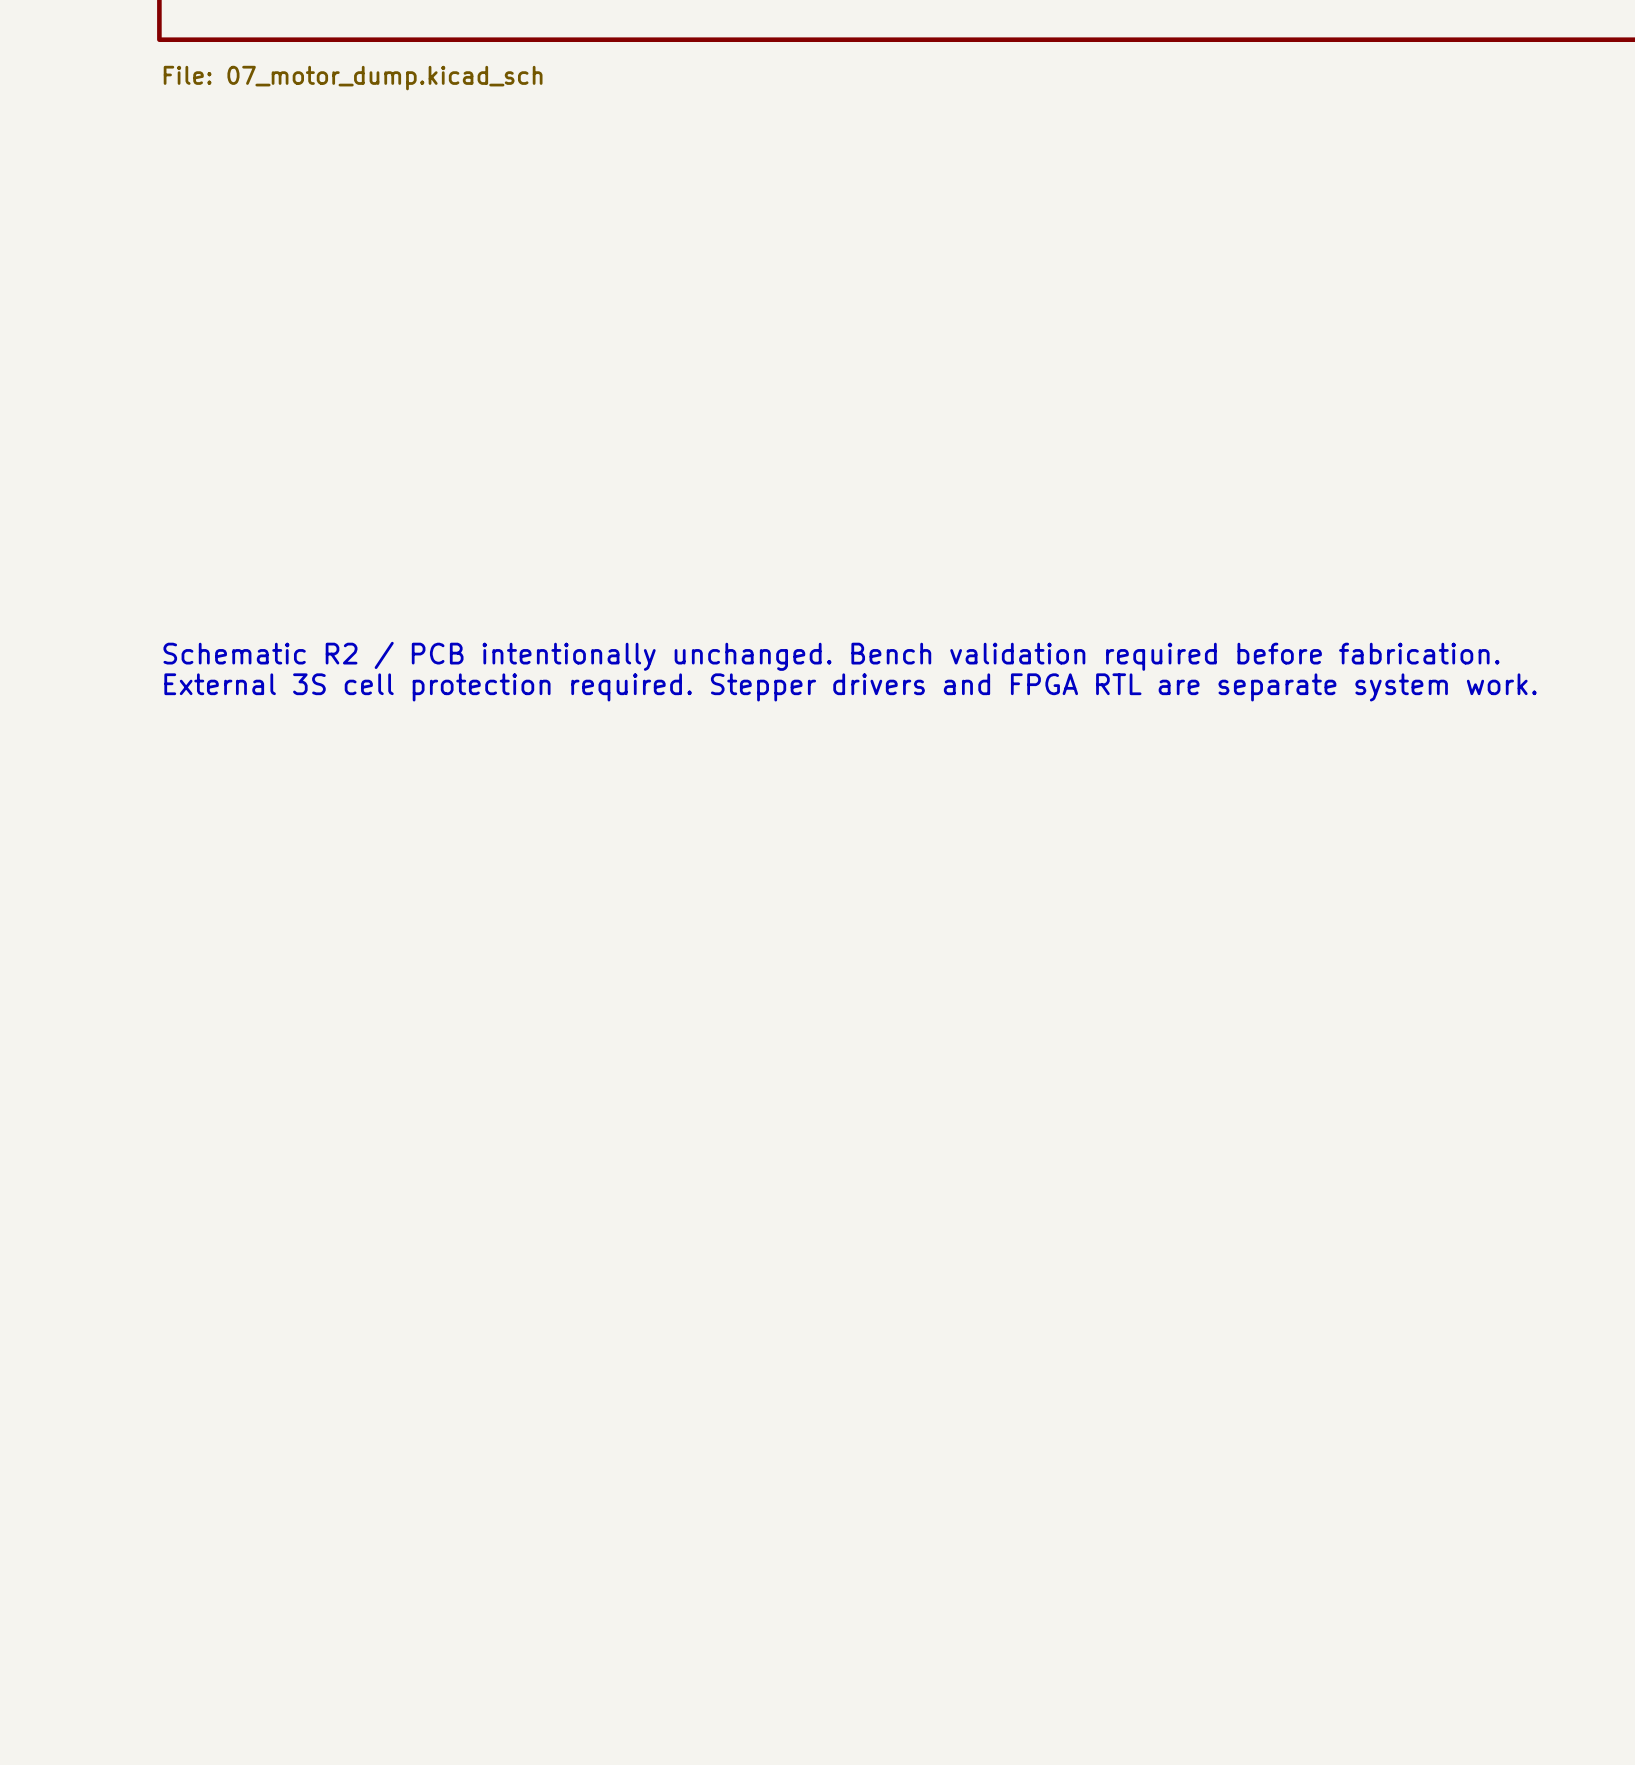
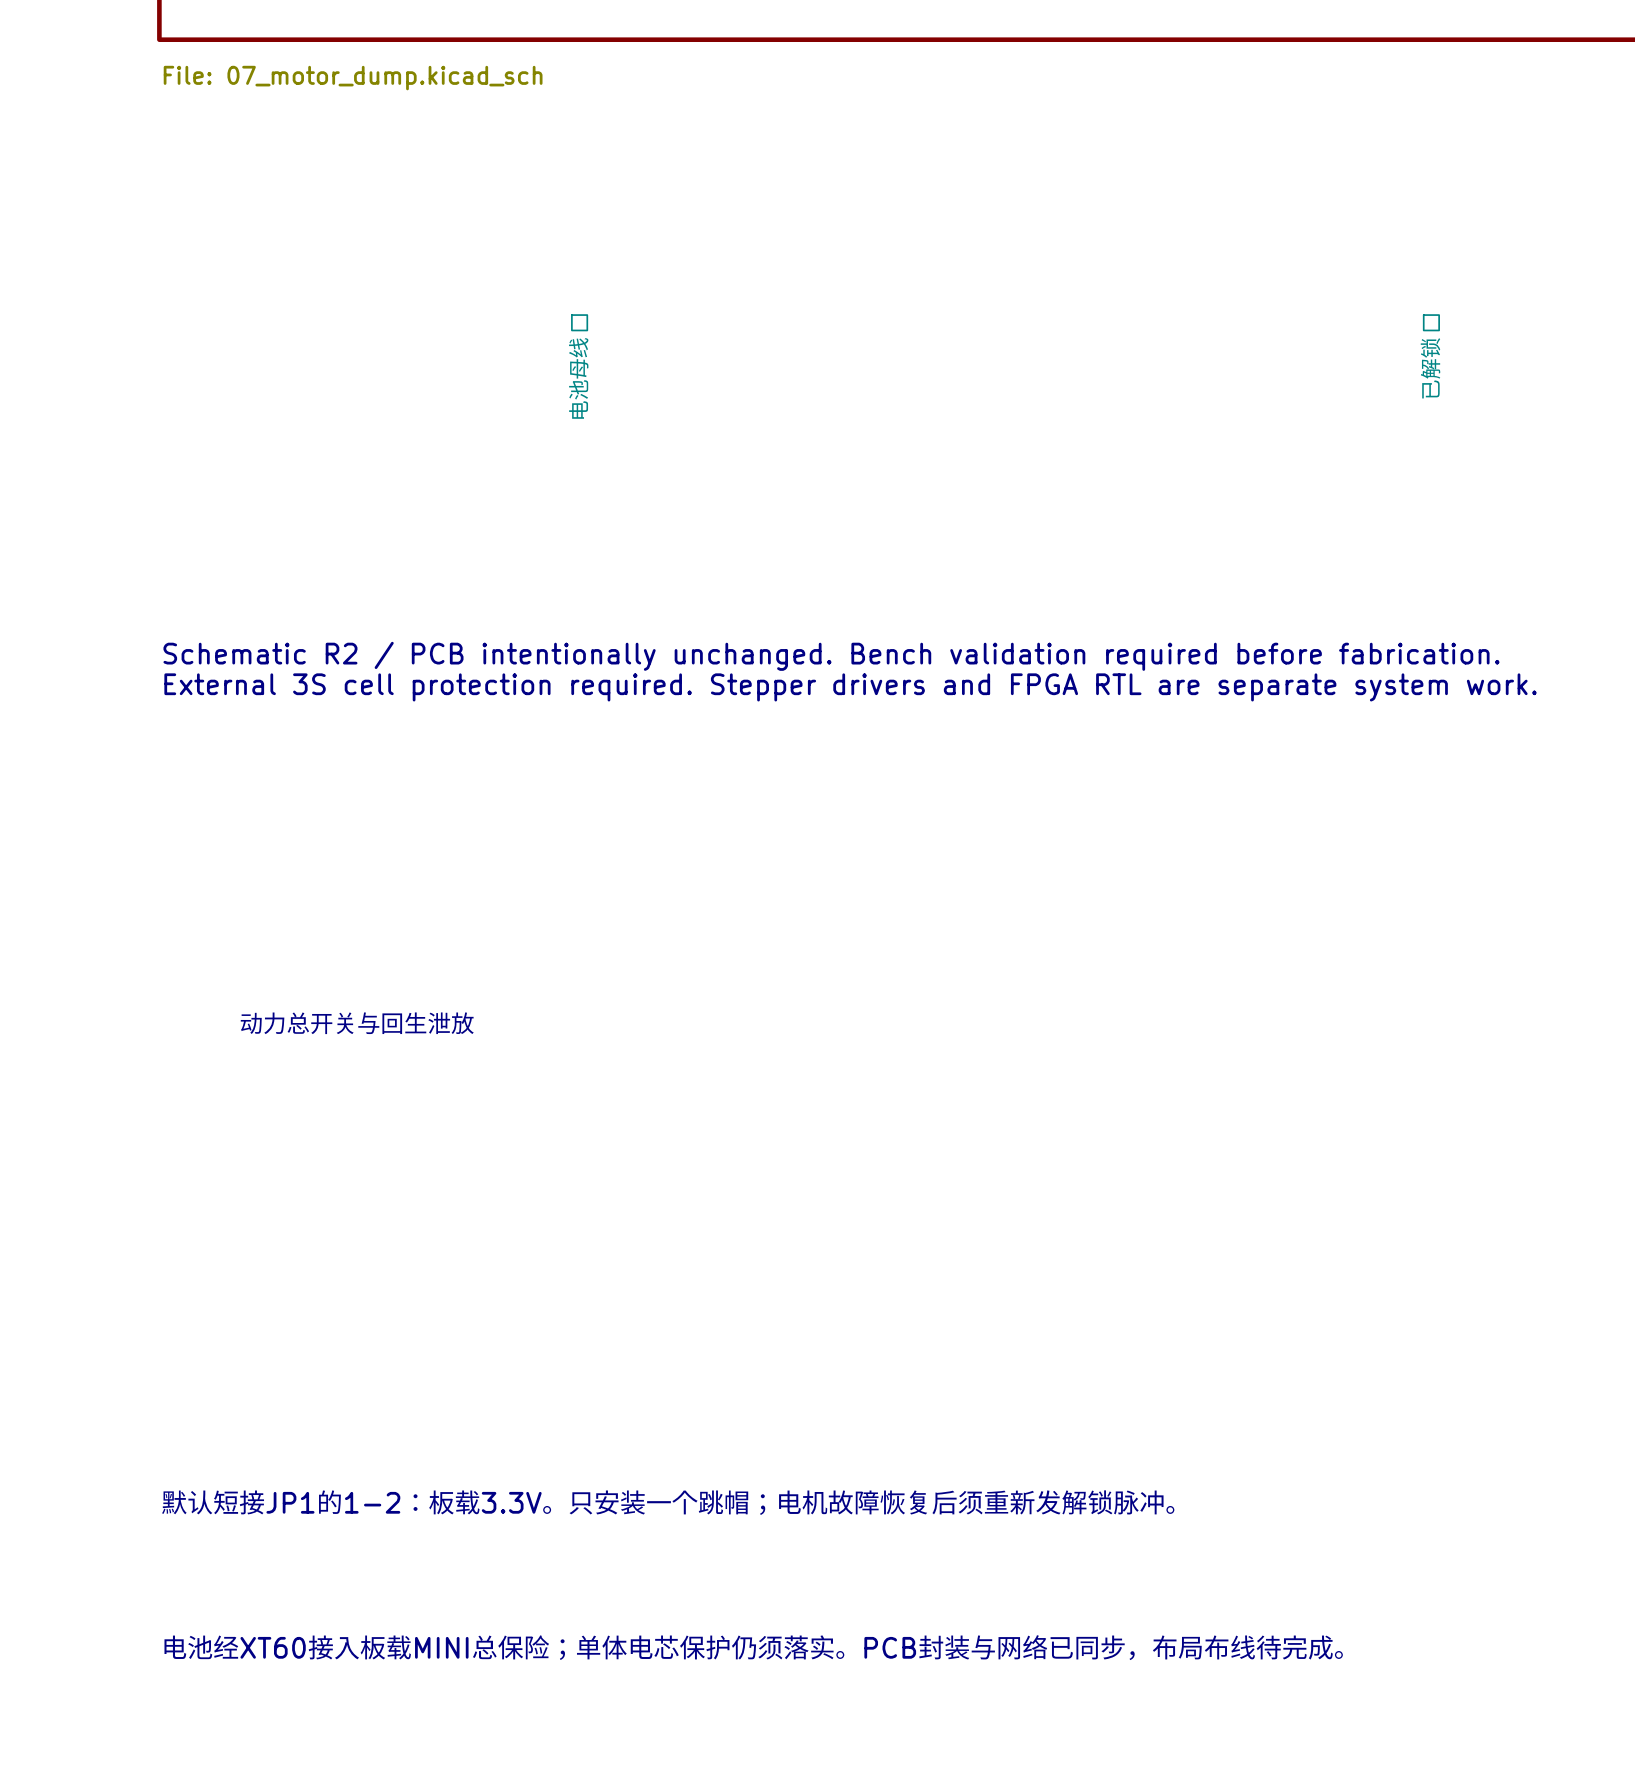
sheet pin: none -> 已解锁 (1430, 368)
sheet pin: none -> 电池母线 (578, 378)
text: none -> 动力总开关与回生泄放 (357, 1023)
text: none -> 默认短接JP1的1-2：板载3.3V。只安装一个跳帽；电机故障恢复后须重新发解锁脉冲。 (668, 1502)
text: none -> 电池经XT60接入板载MINI总保险；单体电芯保护仍须落实。PCB封装与网络已同步，布局布线待完成。 (753, 1647)

